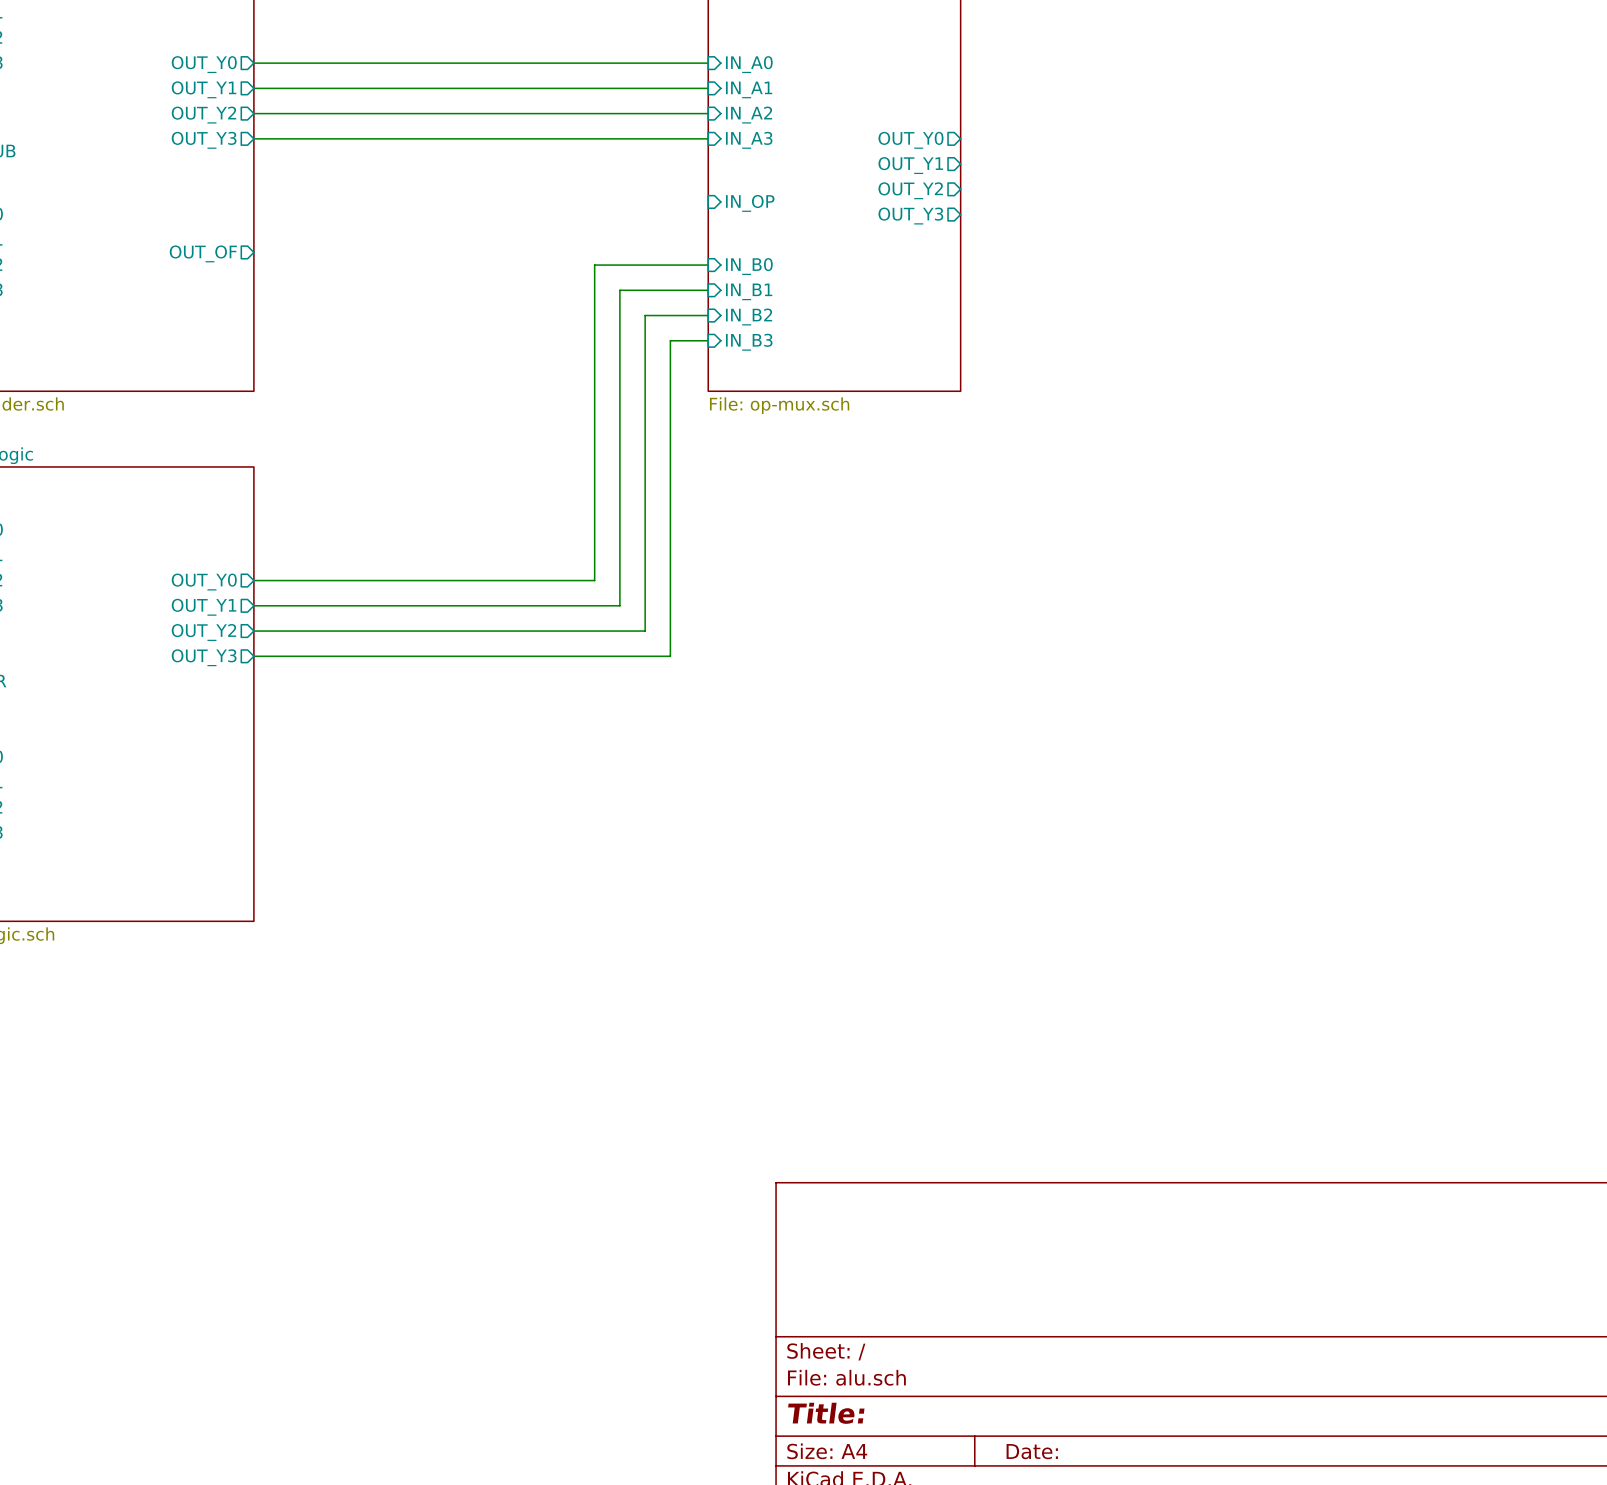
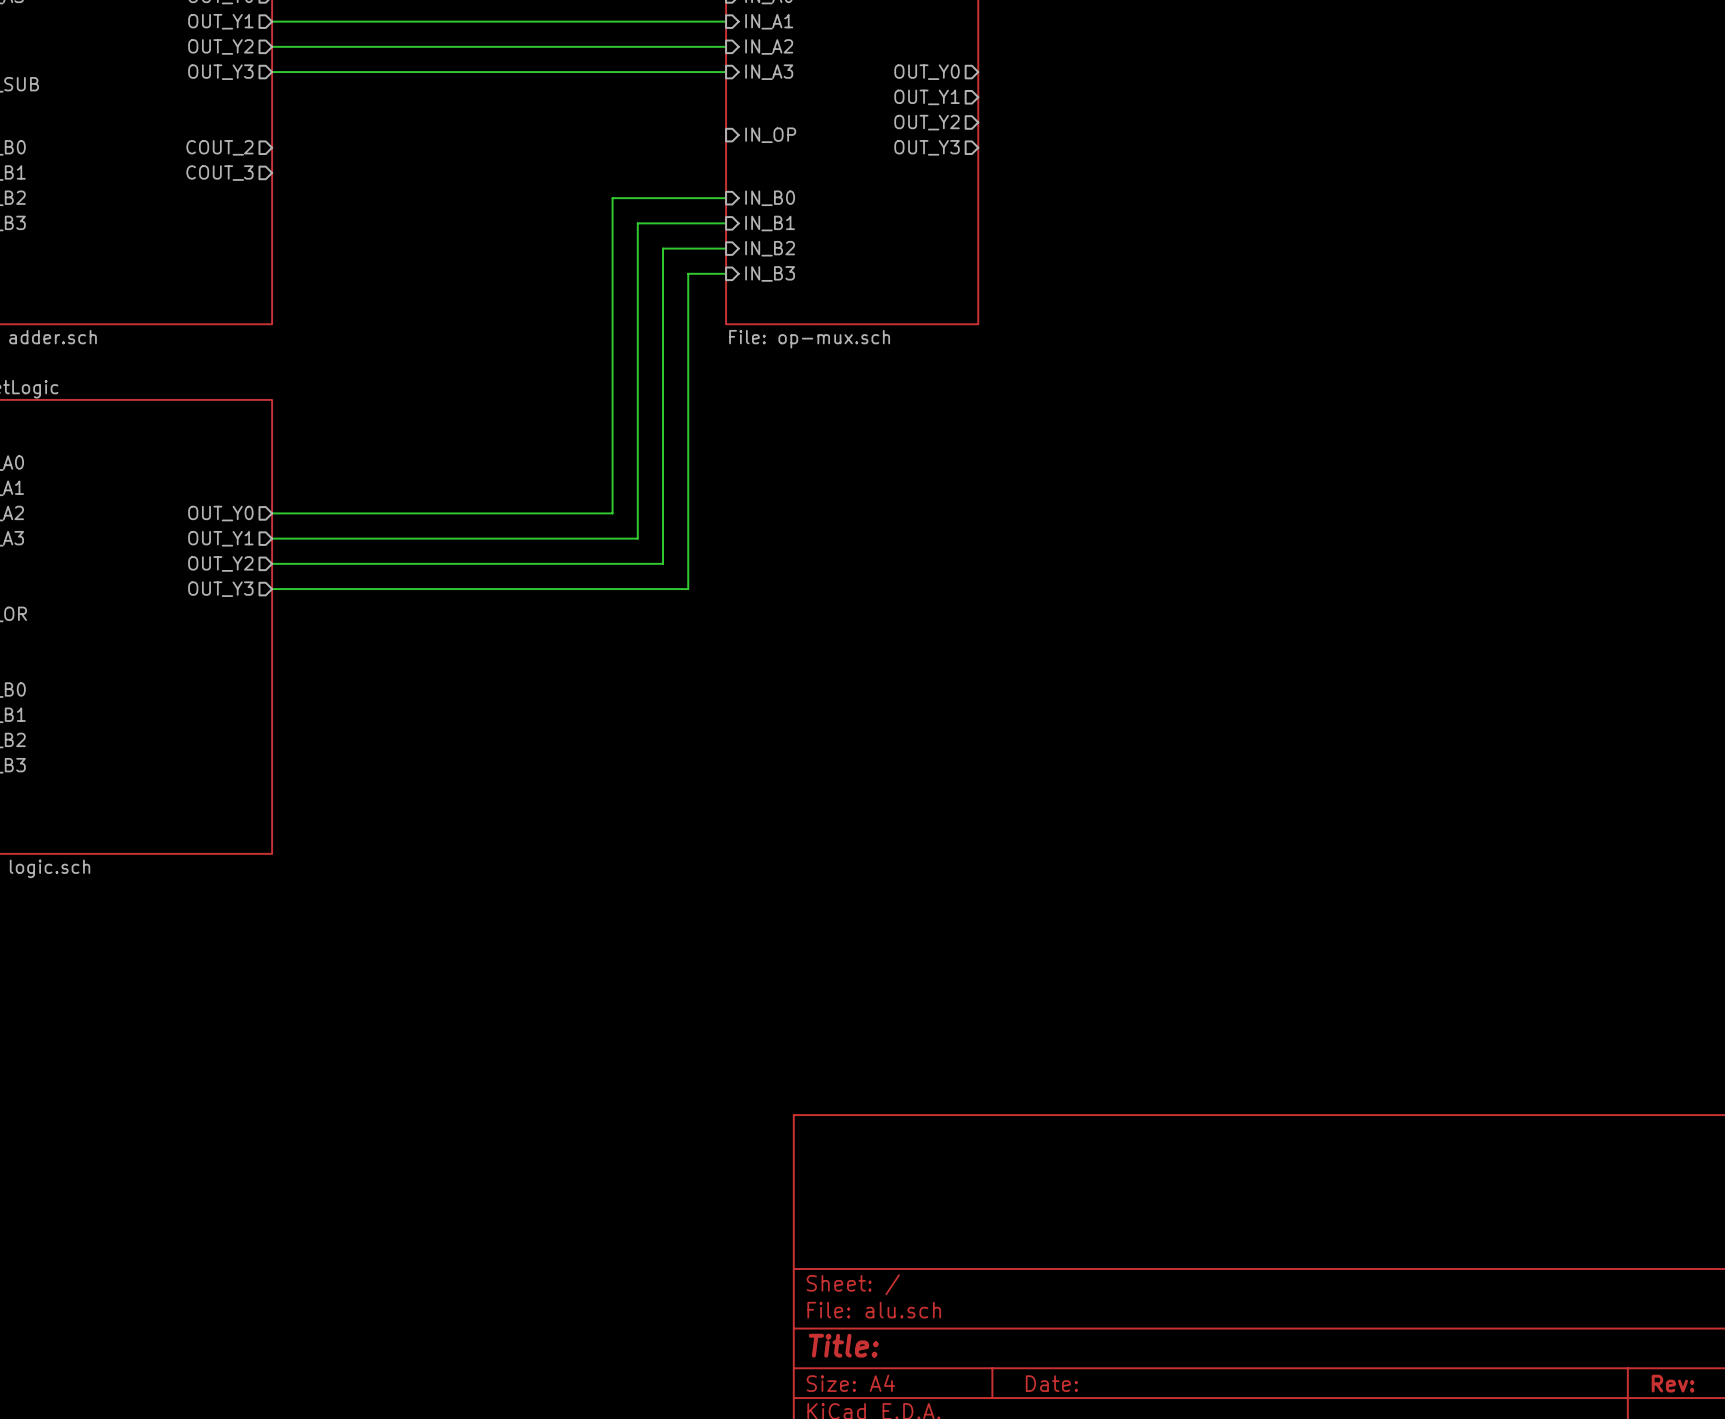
sheet pin: none -> COUT_2 (219, 147)
sheet pin: OUT_OF (203, 253) -> COUT_3 (219, 173)

